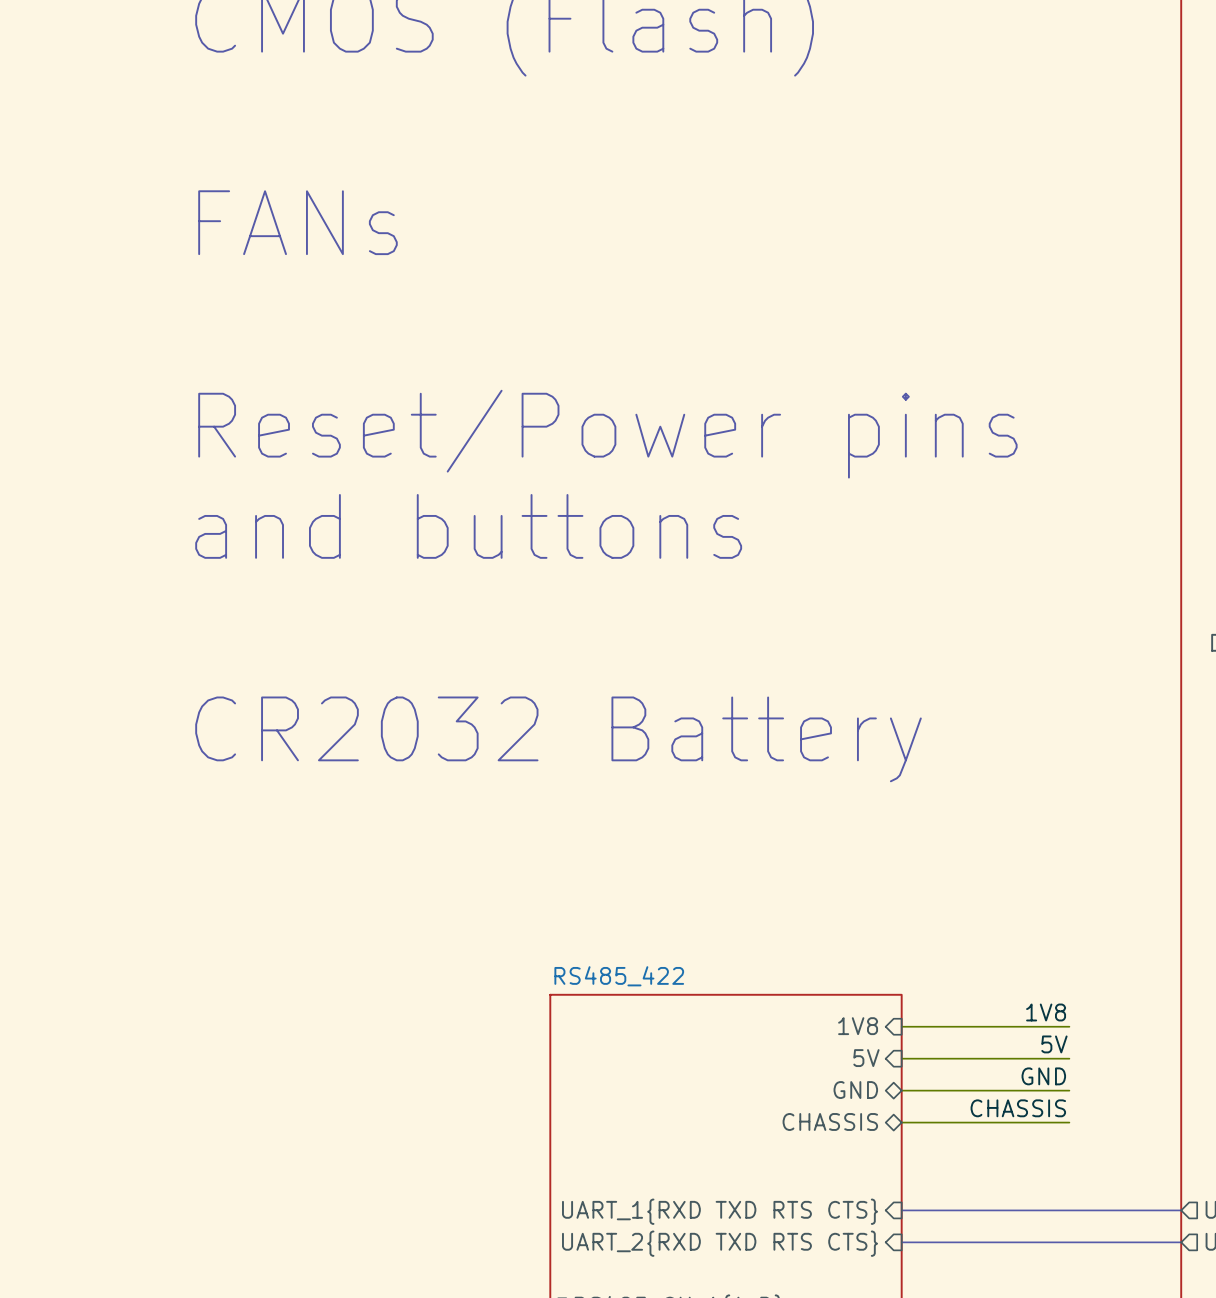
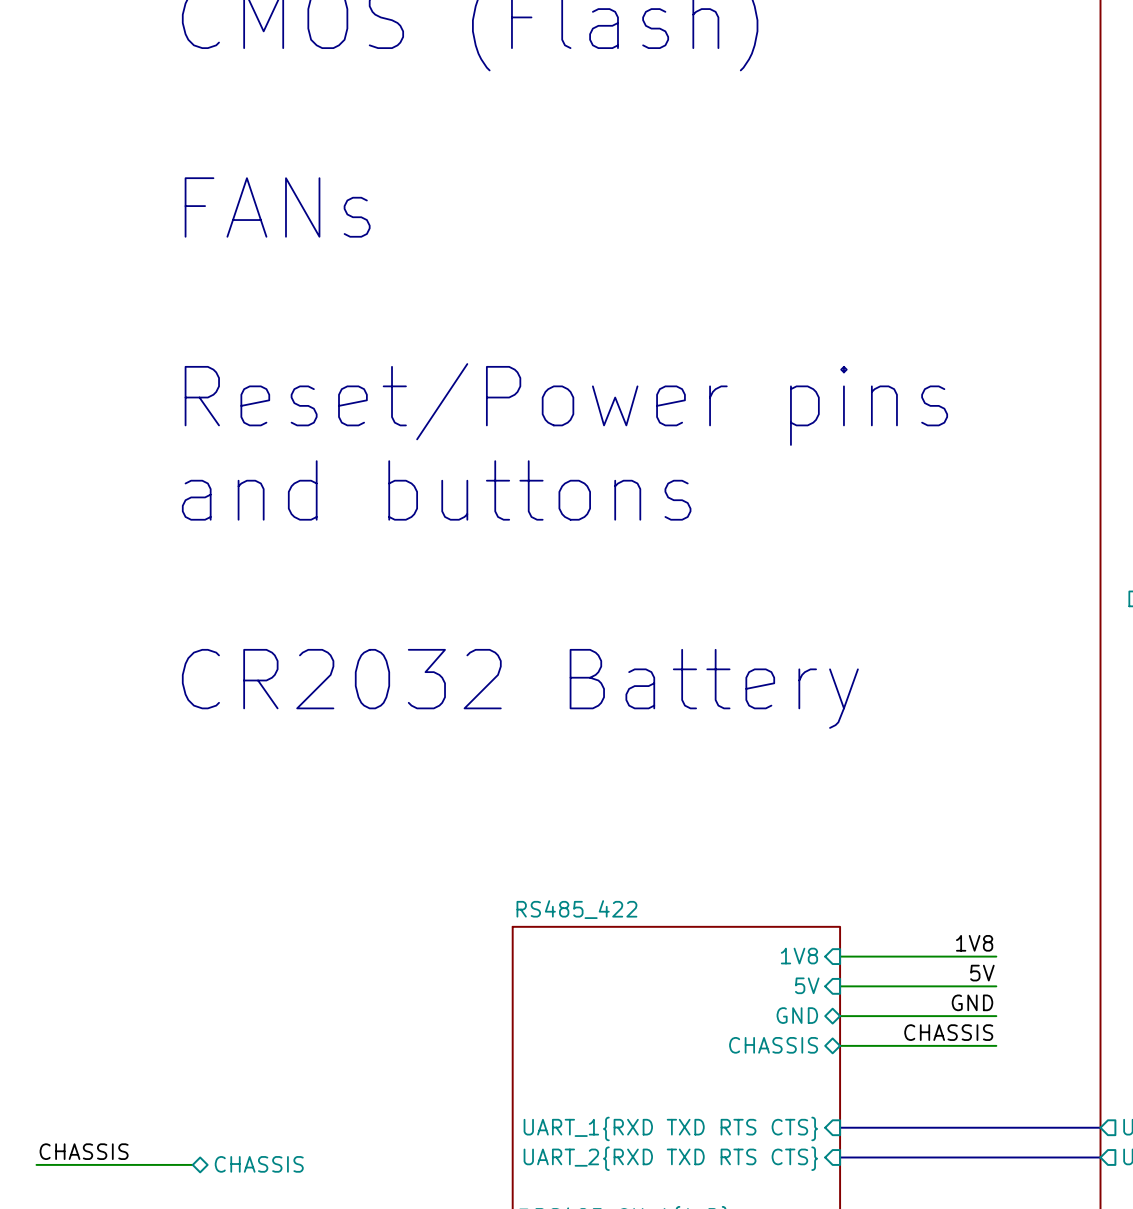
label: none -> CHASSIS (84, 1151)
sheet pin: none -> CHASSIS (259, 1164)
wire: none -> (36, 1164) (192, 1164)

